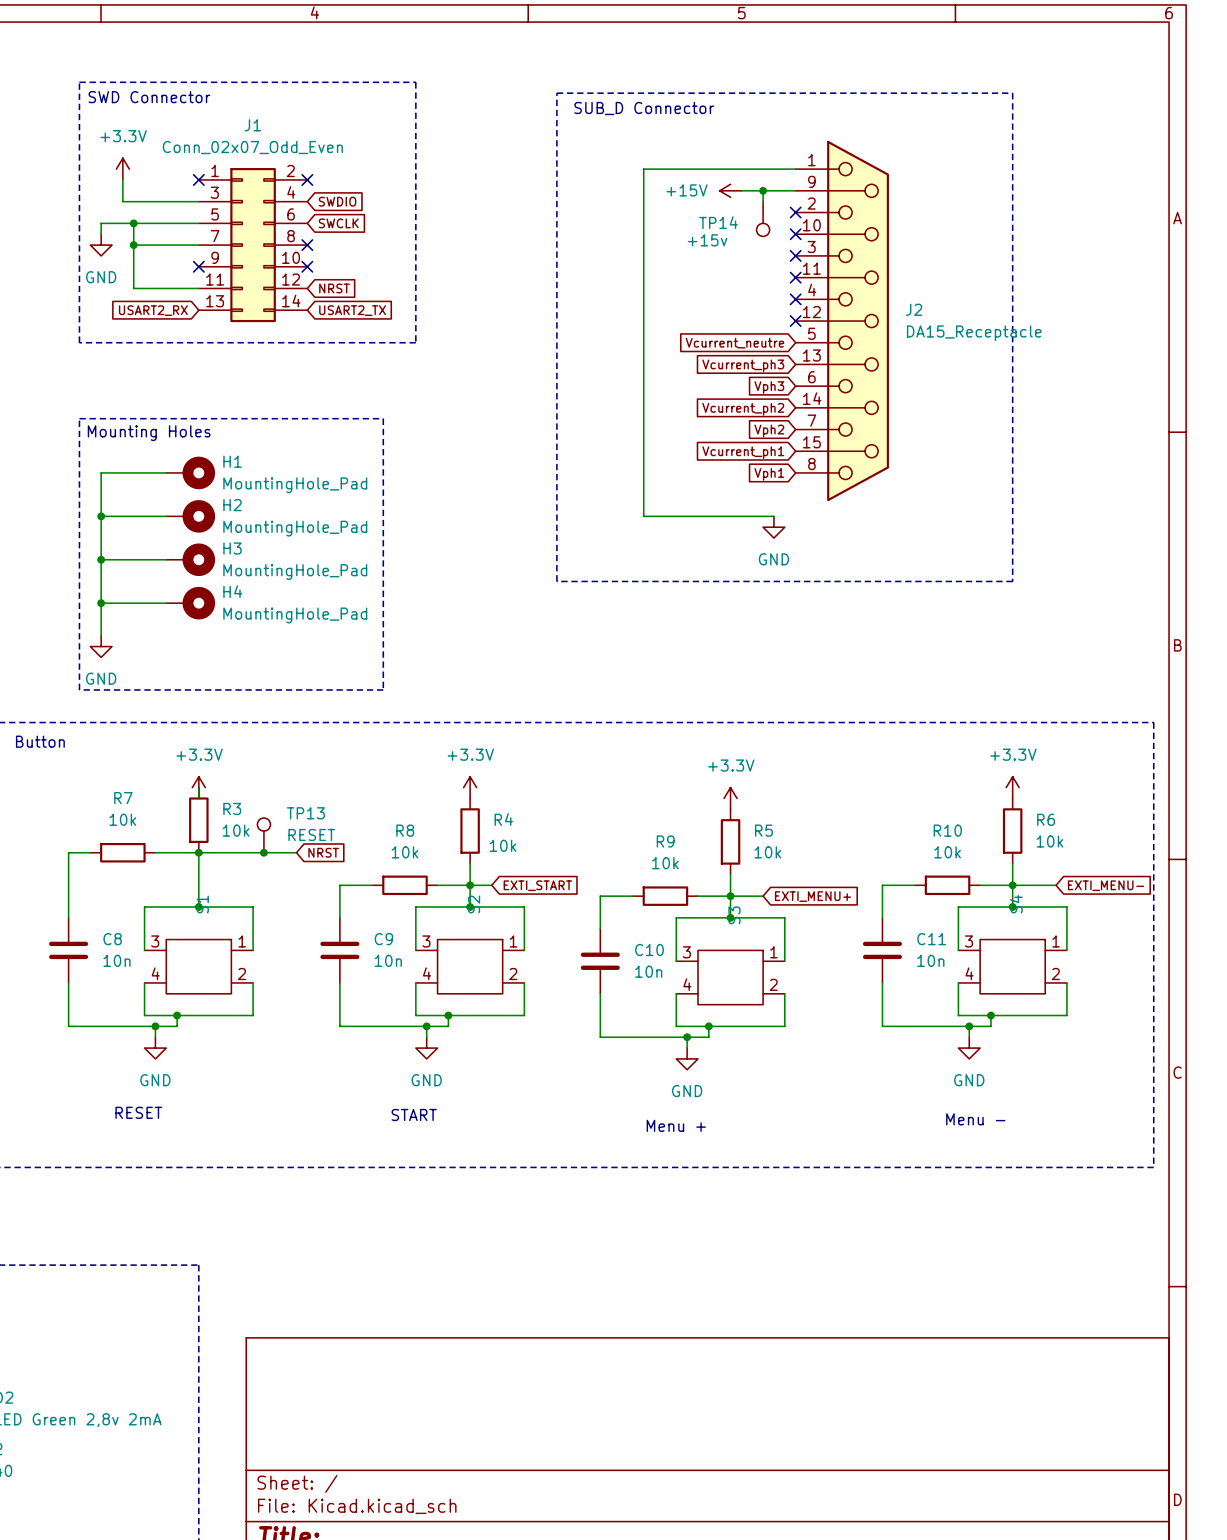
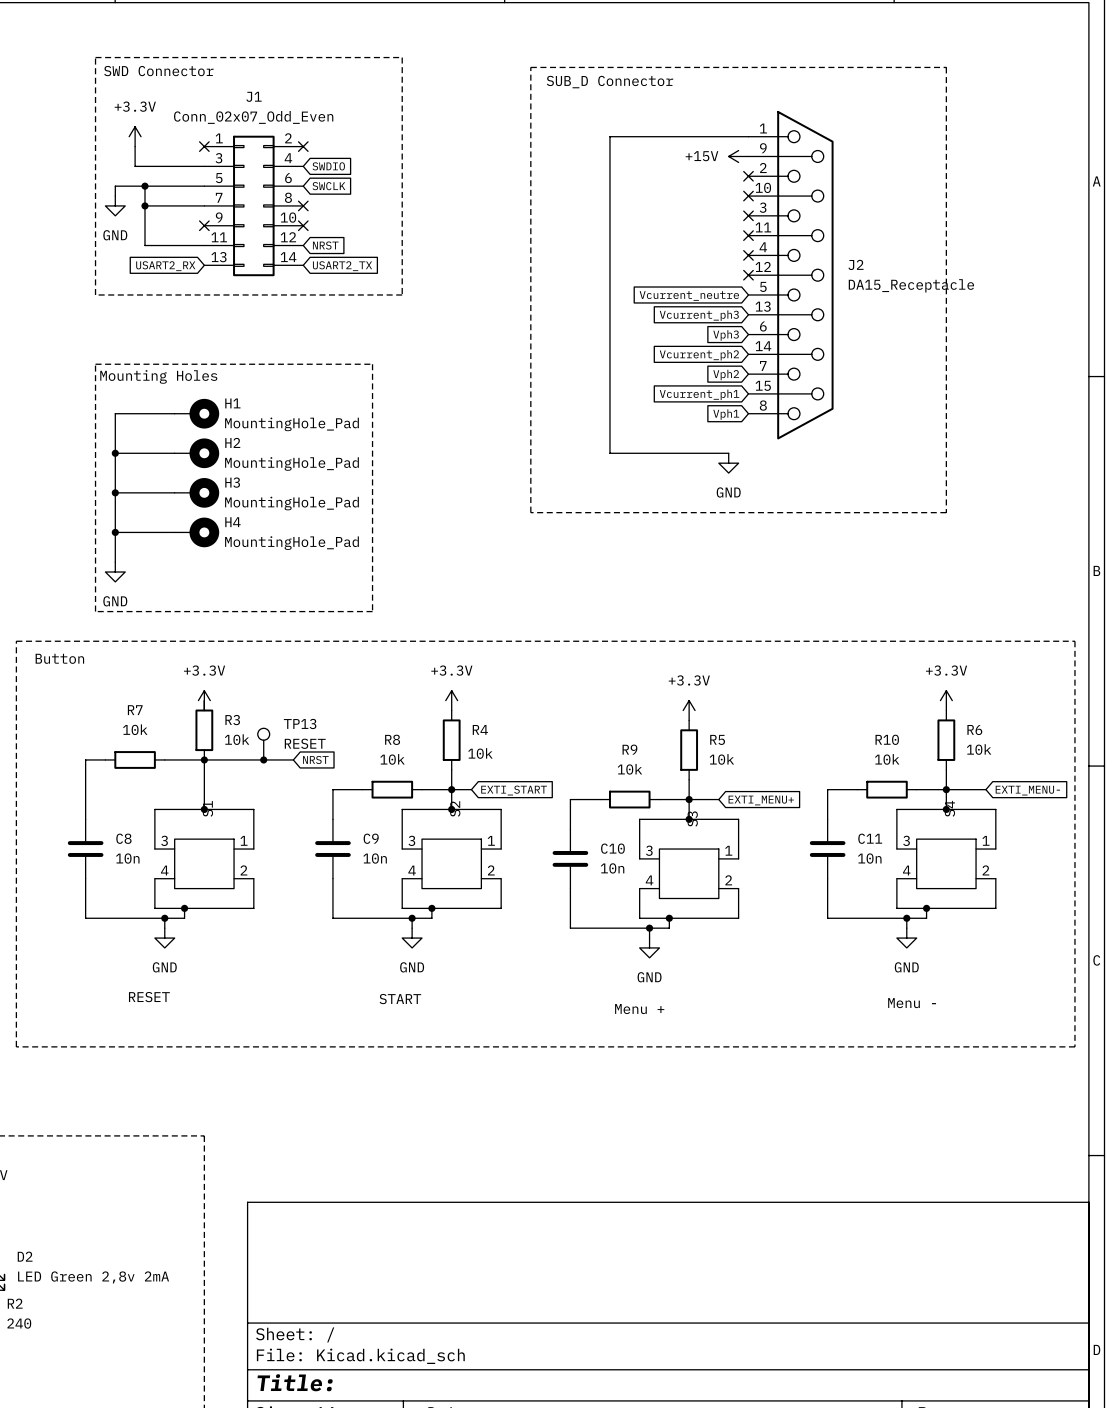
power symbol position: +15V (730, 190) -> +15V (738, 156)
wire: (763, 190) (763, 201) -> none
junction: (763, 190) -> none
TP14: +15v (763, 219) -> none

